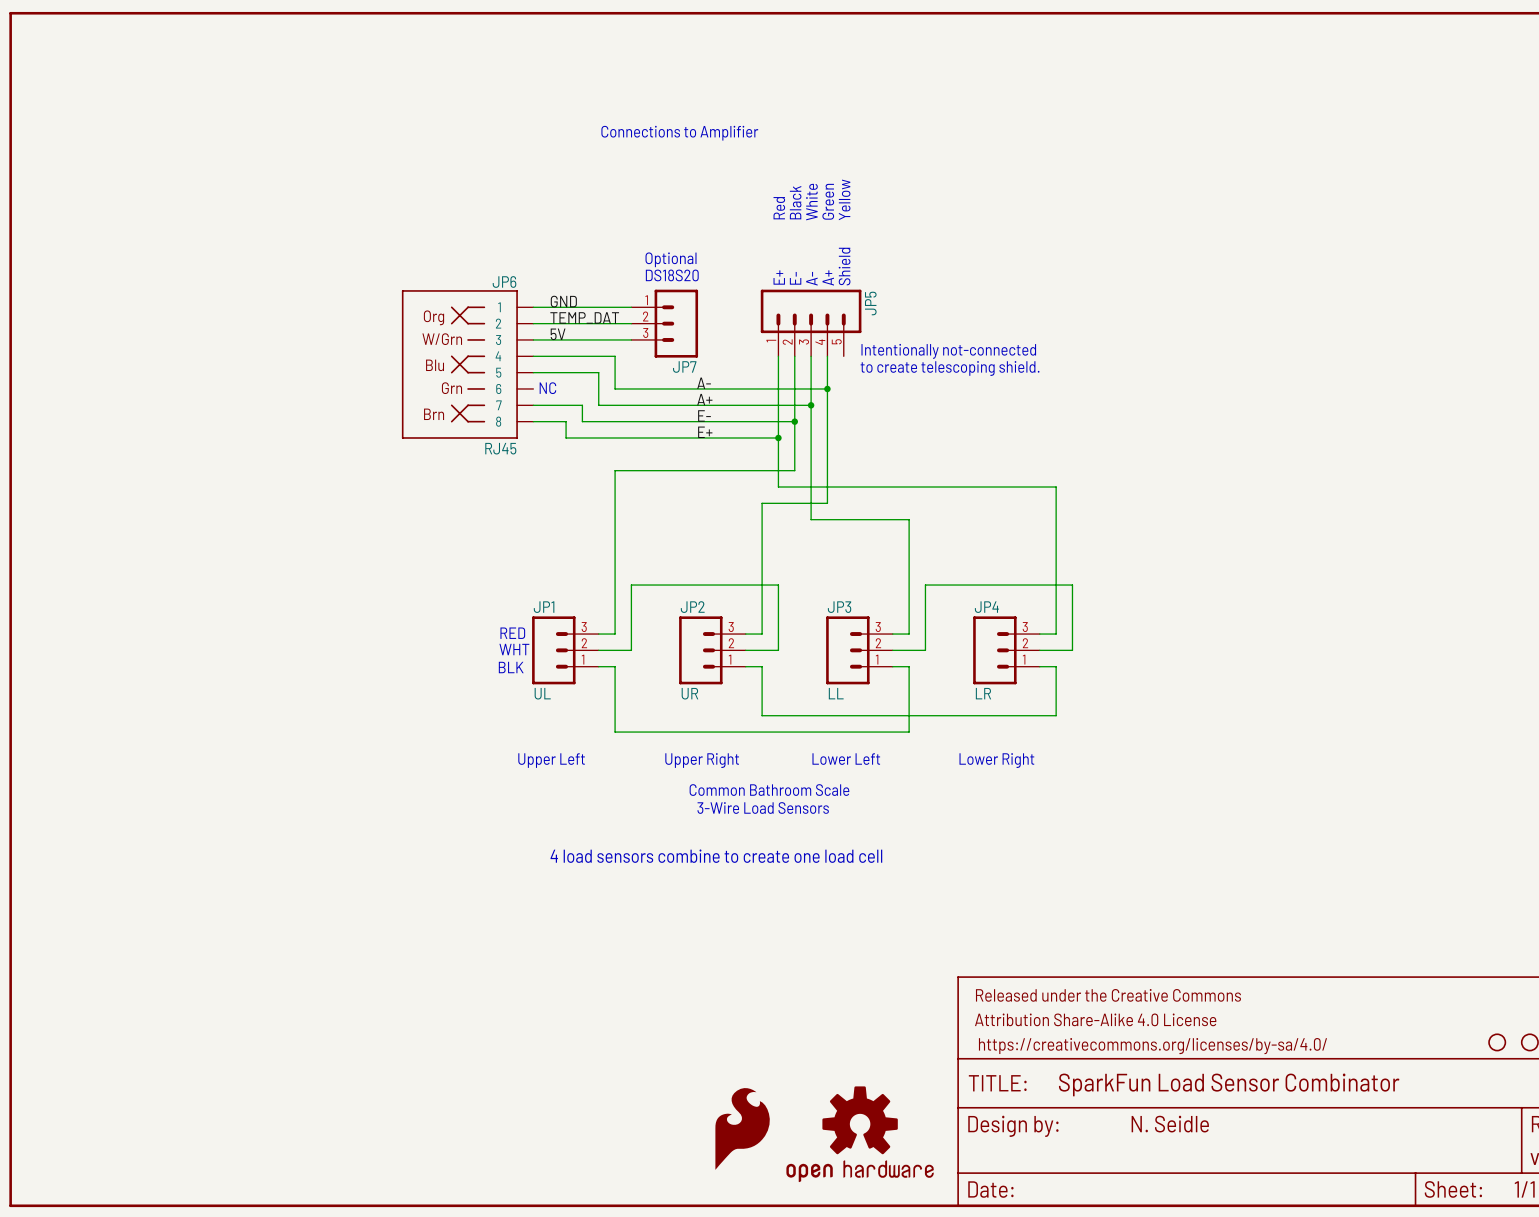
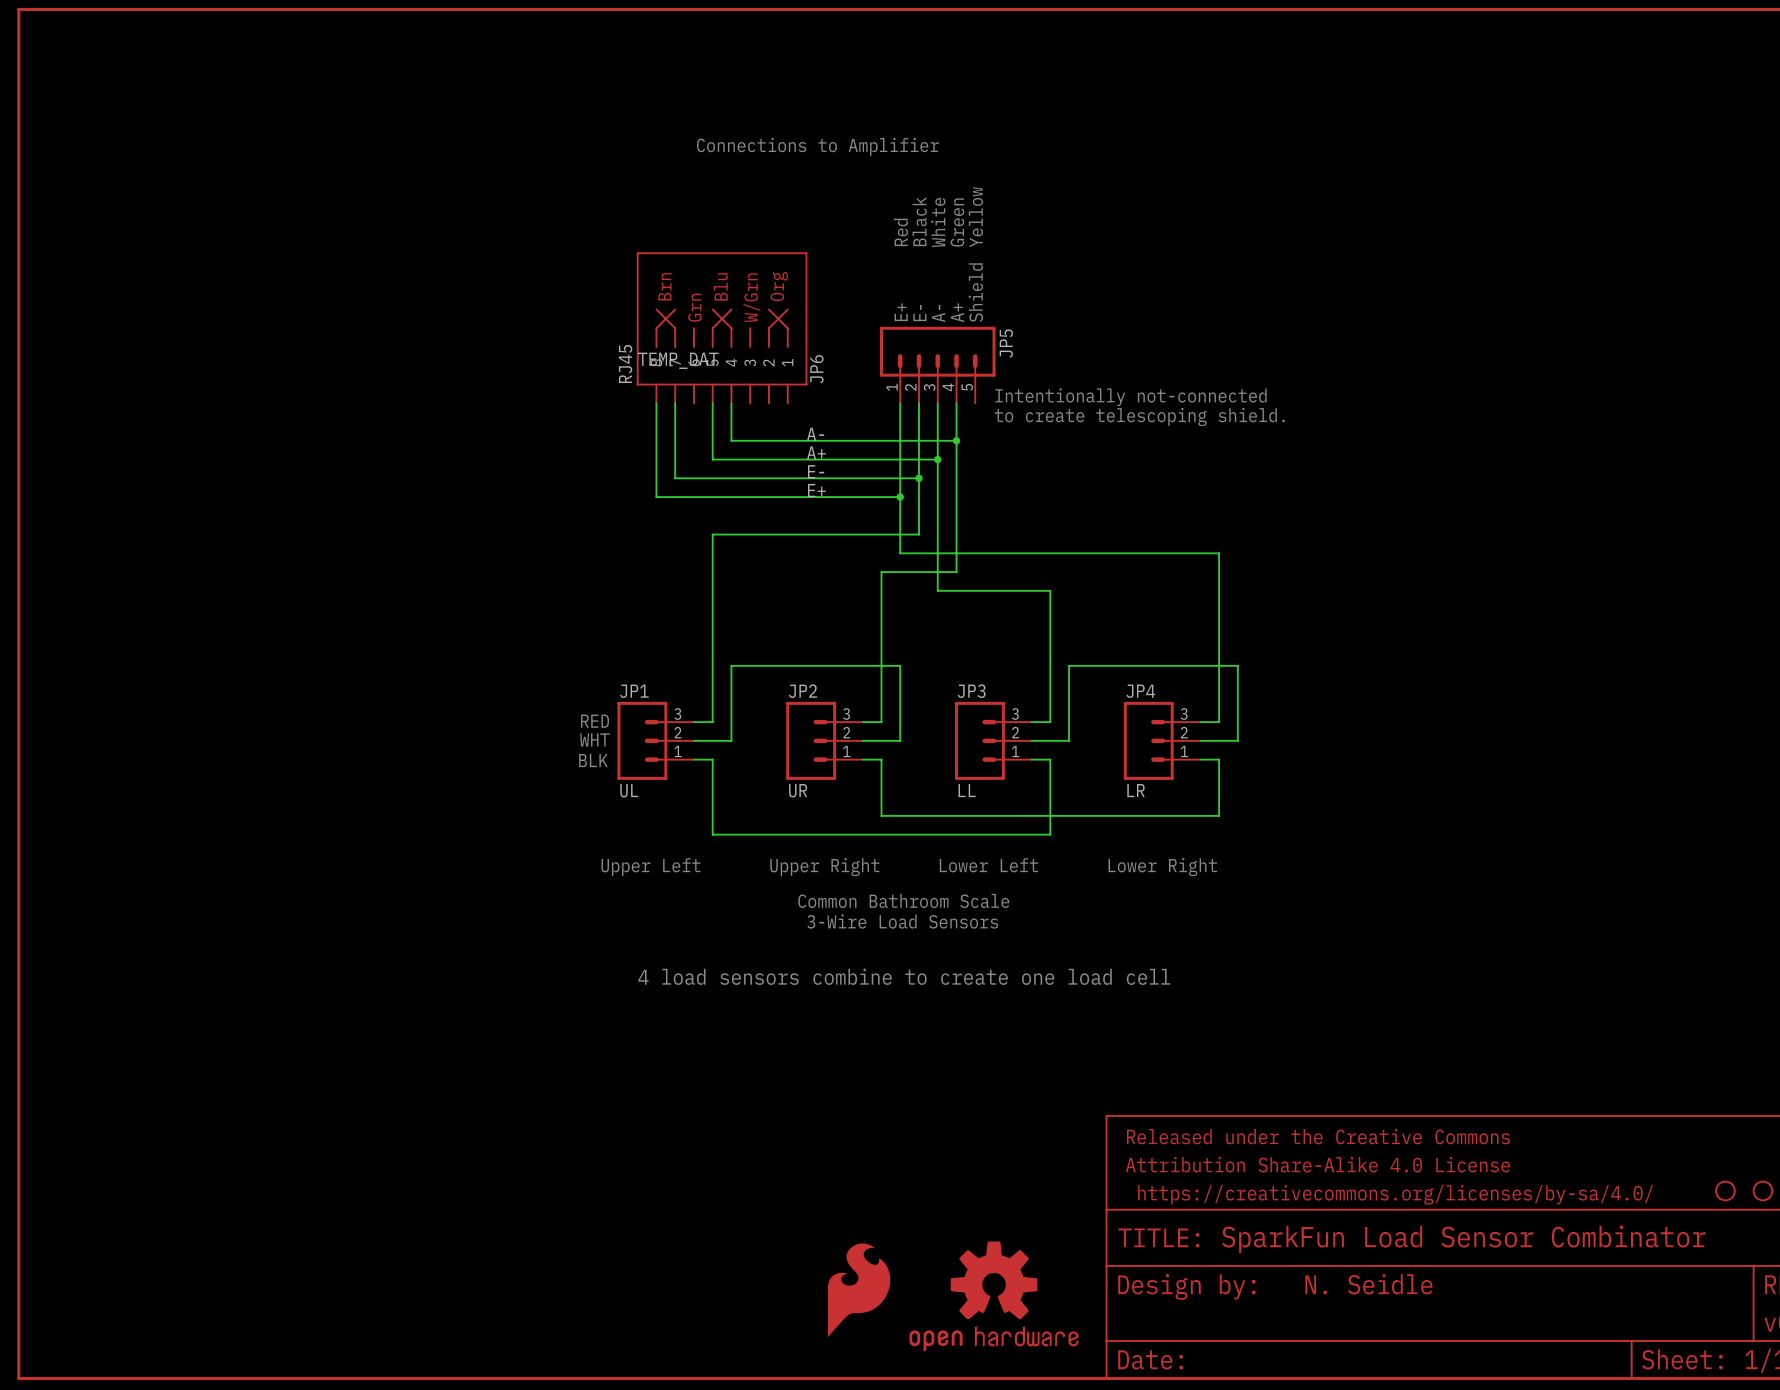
text: Optional (671, 259) -> none
text: DS18S20 (672, 275) -> none
JP6 name position: JP6 (504, 281) -> JP6 (816, 369)
JP6 symbol: [401, 290, 534, 439] -> [636, 252, 808, 404]
label: GND (563, 301) -> none
wire: (533, 307) (631, 307) -> none
wire: (533, 323) (631, 323) -> none
JP7: (664, 323) -> none
label: 5V (558, 334) -> none
wire: (533, 356) (615, 356) -> none
wire: none -> (731, 403) (731, 440)
wire: (533, 372) (598, 372) (598, 405) (615, 405) -> none
text: NC (547, 388) -> none
wire: (615, 388) (631, 388) -> (712, 440) (712, 459)
wire: (533, 405) (582, 405) -> (675, 403) (675, 459)
wire: (533, 421) (566, 421) -> (656, 403) (656, 478)
JP6 value position: RJ45 (500, 448) -> RJ45 (625, 364)

